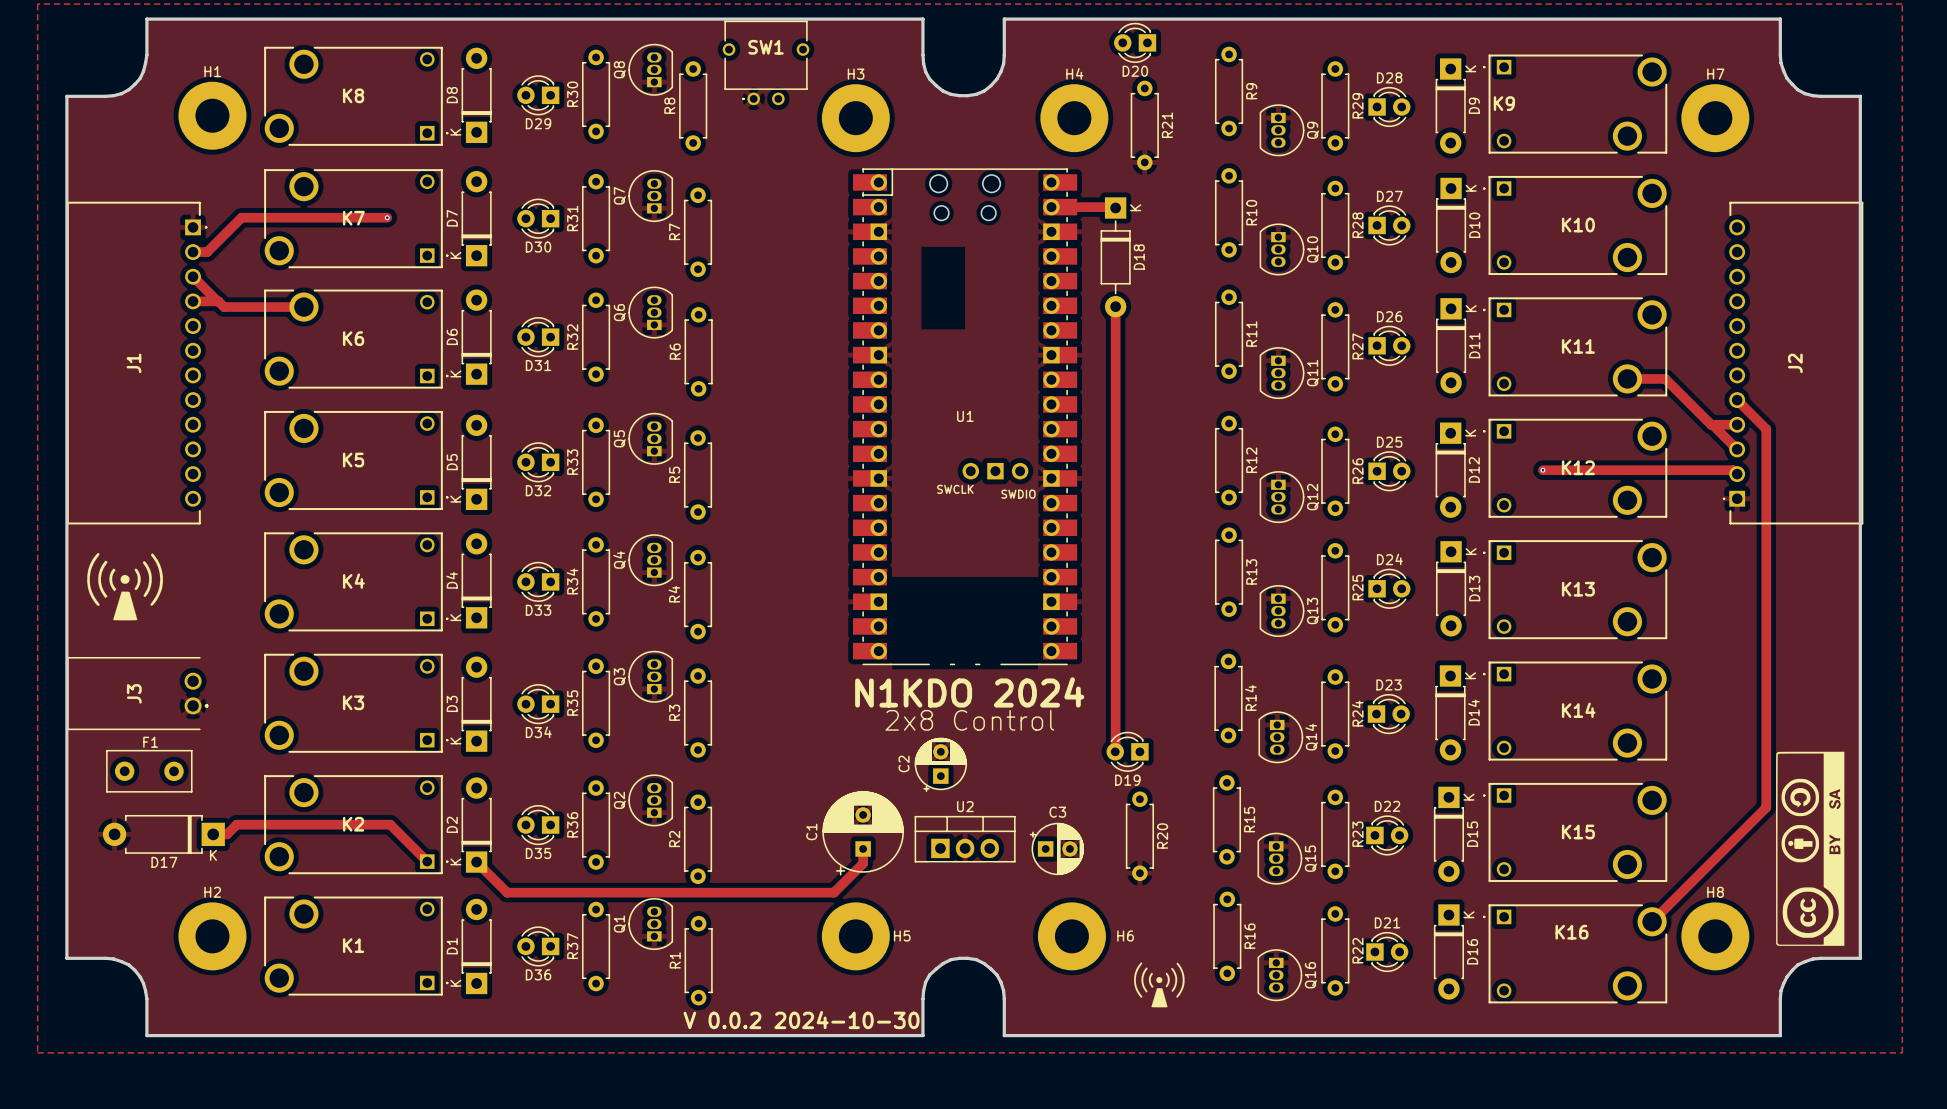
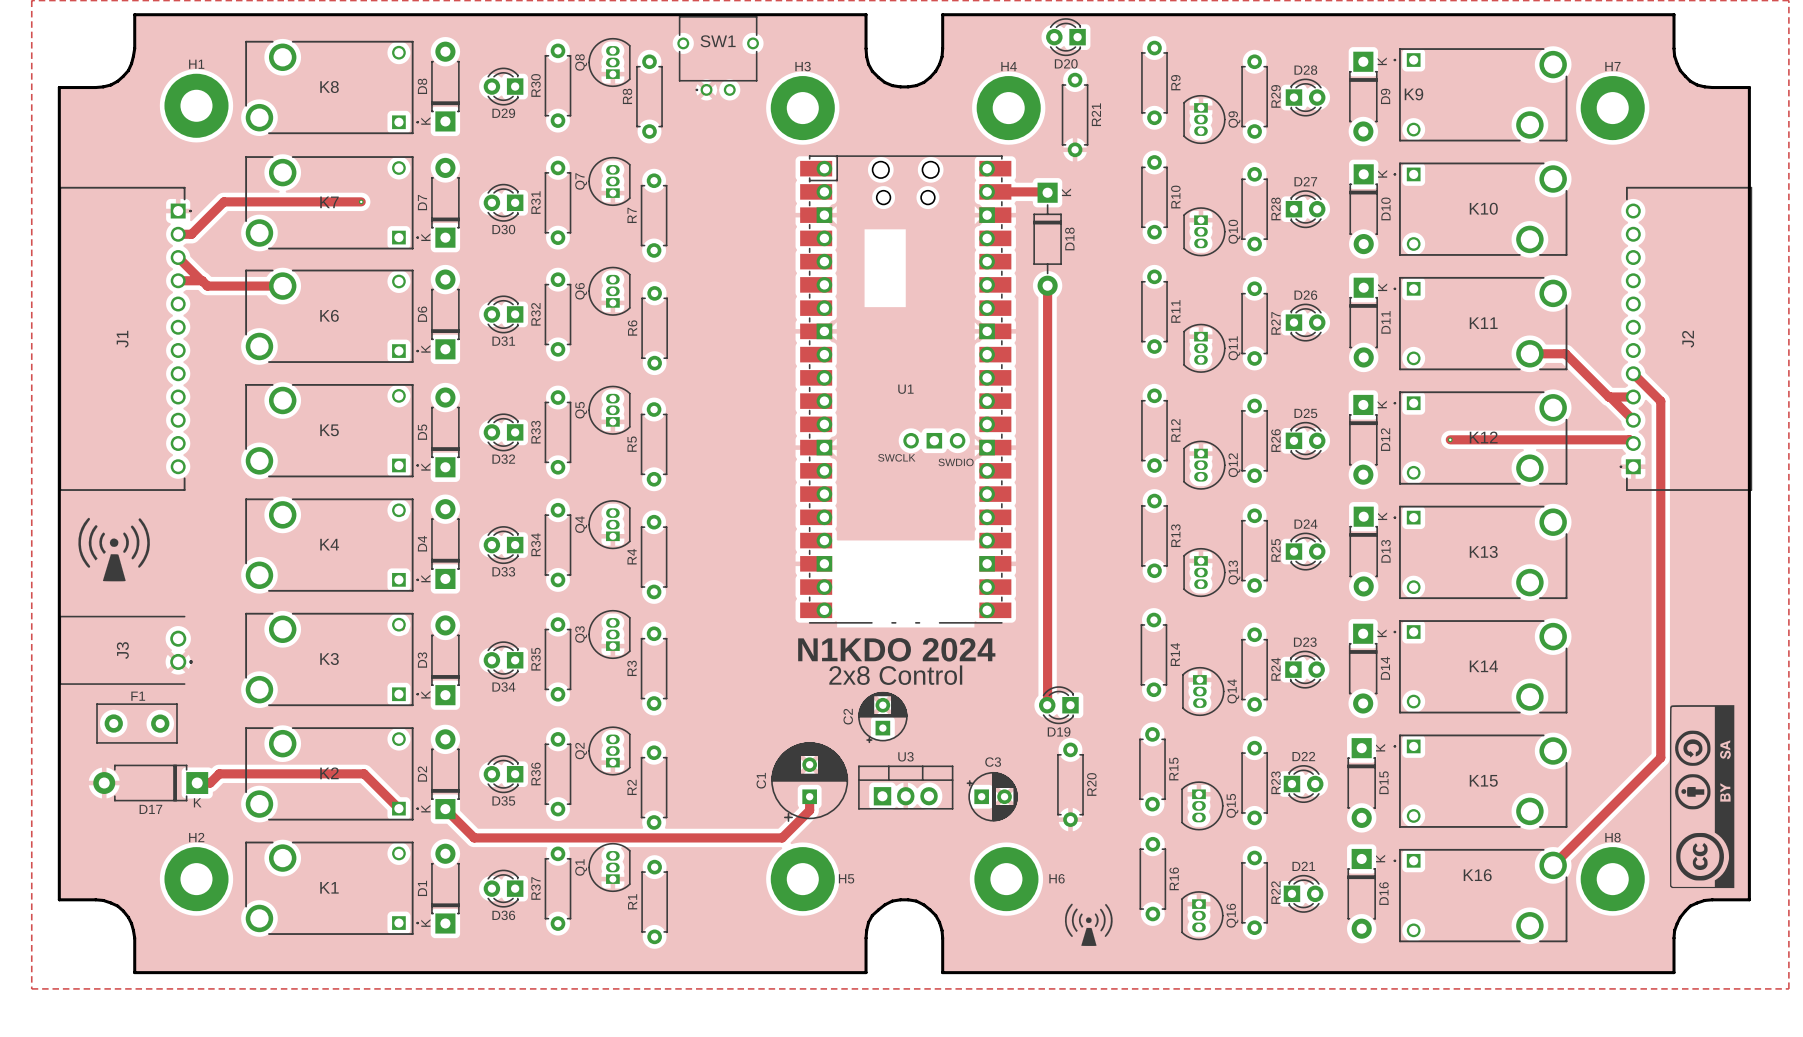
U2 name: U2 (965, 806) -> U3 (905, 756)
text: V 0.0.2 2024-10-30 (801, 1020) -> none

